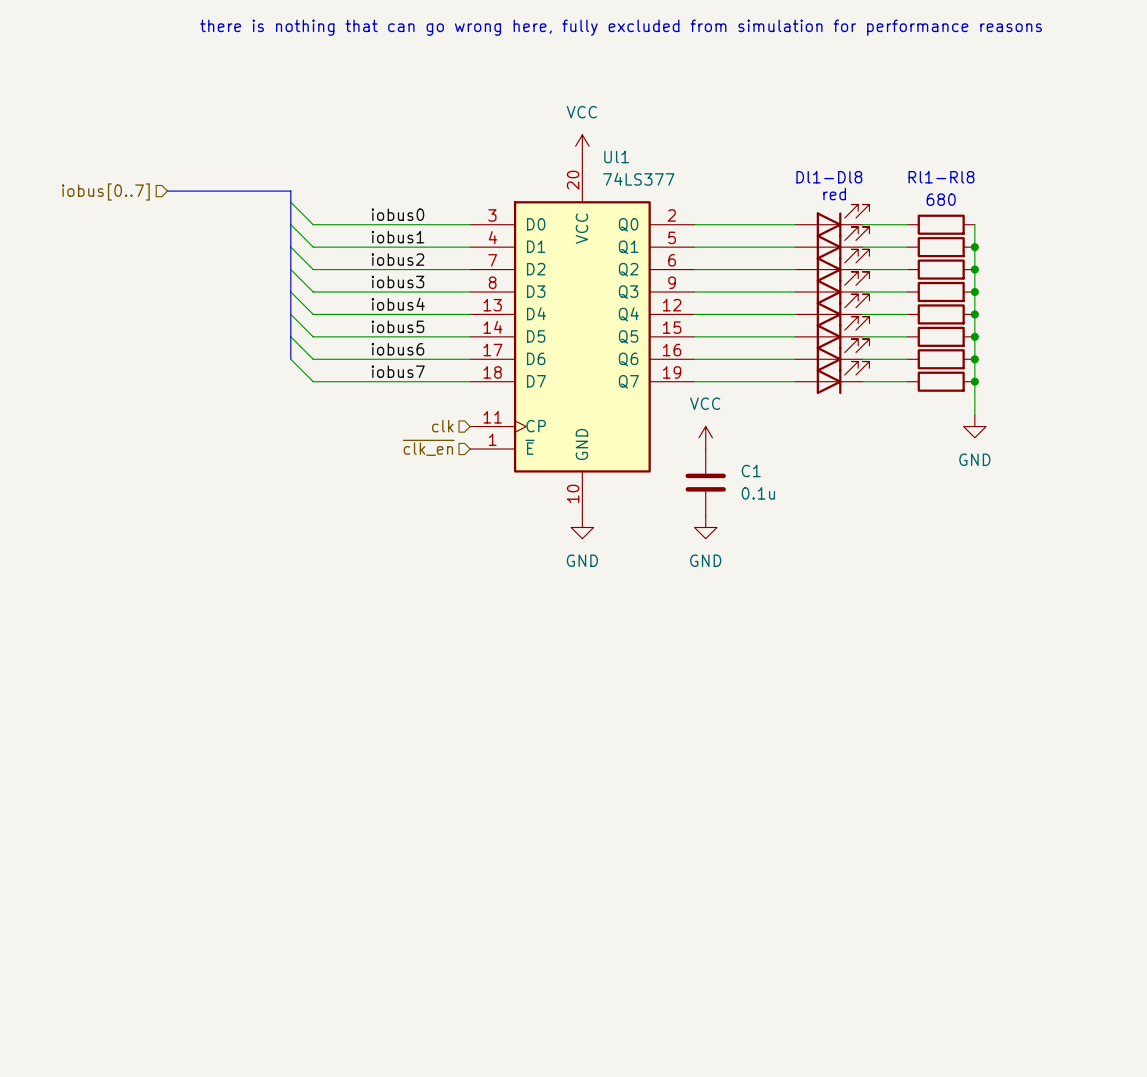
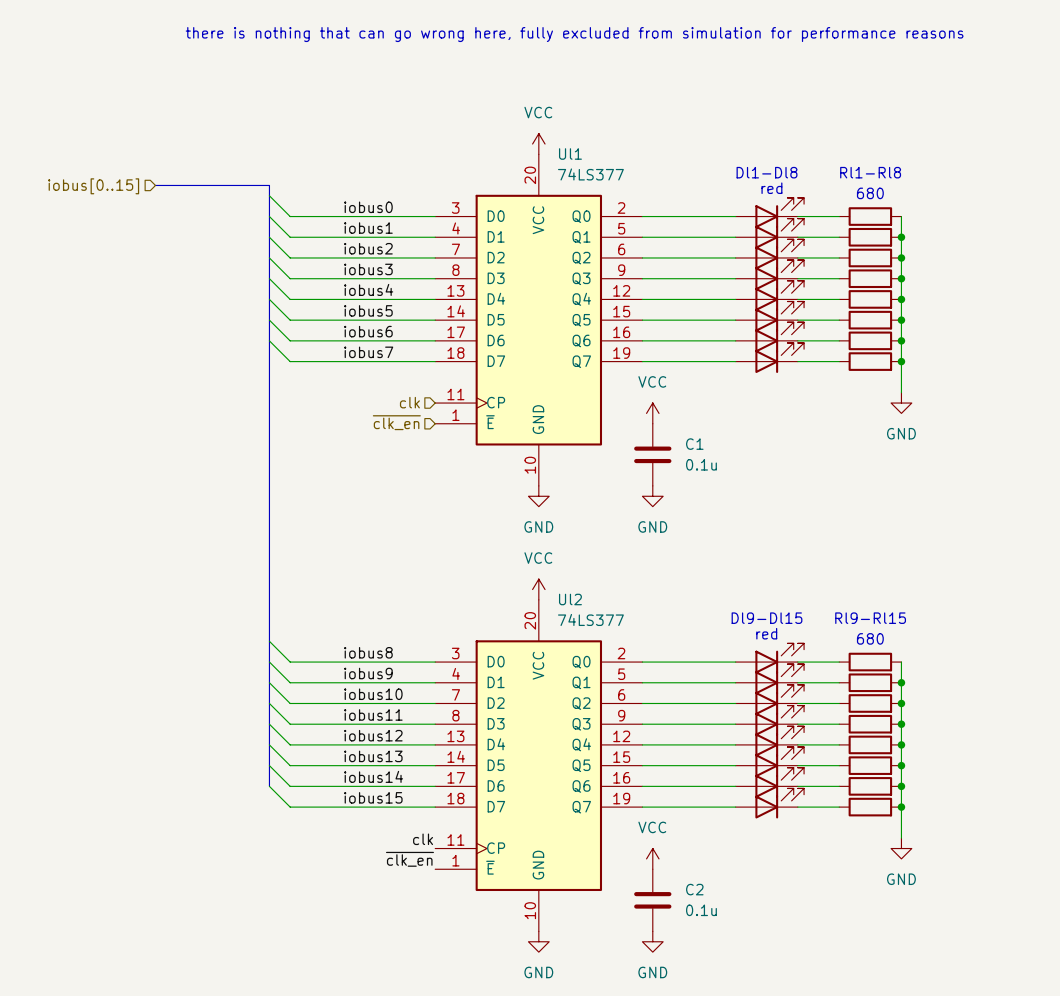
hierarchical label: iobus[0..7] (105, 191) -> iobus[0..15] (93, 186)
bus: none -> (269, 340) (269, 786)
power symbol: none -> VCC (538, 589)
text: none -> Dl9-Dl15 (767, 618)
text: none -> Rl9-Rl15 (870, 618)
text: none -> red (766, 633)
text: none -> 680 (870, 638)
wire: none -> (269, 641) (290, 662) (435, 662)
label: none -> iobus8 (368, 652)
part: none -> (769, 658)
wire: none -> (269, 662) (290, 682) (435, 682)
wire: none -> (642, 662) (735, 662)
wire: none -> (797, 662) (839, 662)
part: none -> (870, 662)
wire: none -> (901, 662) (901, 838)
label: none -> iobus9 (368, 673)
part: none -> (769, 679)
wire: none -> (269, 682) (290, 703) (435, 703)
wire: none -> (642, 682) (735, 682)
wire: none -> (797, 682) (839, 682)
part: none -> (870, 682)
junction: none -> (901, 682)
label: none -> iobus10 (373, 694)
part: none -> (769, 699)
wire: none -> (269, 703) (290, 724) (435, 724)
wire: none -> (642, 703) (735, 703)
wire: none -> (797, 703) (839, 703)
part: none -> (870, 703)
junction: none -> (901, 703)
label: none -> iobus11 (373, 714)
part: none -> (769, 720)
wire: none -> (269, 724) (290, 744) (435, 744)
wire: none -> (642, 724) (735, 724)
wire: none -> (797, 724) (839, 724)
part: none -> (870, 724)
junction: none -> (901, 724)
label: none -> iobus12 (373, 735)
part: none -> (769, 741)
wire: none -> (269, 744) (290, 765) (435, 765)
wire: none -> (642, 744) (735, 744)
wire: none -> (797, 744) (839, 744)
part: none -> (870, 744)
junction: none -> (901, 744)
label: none -> iobus13 (373, 756)
part: none -> (769, 762)
wire: none -> (269, 765) (290, 786) (435, 786)
Ul2: none -> 74LS377 (538, 765)
wire: none -> (642, 765) (735, 765)
wire: none -> (797, 765) (839, 765)
part: none -> (870, 765)
junction: none -> (901, 765)
label: none -> iobus14 (373, 776)
part: none -> (769, 782)
wire: none -> (269, 786) (290, 807) (435, 807)
wire: none -> (642, 786) (735, 786)
wire: none -> (797, 786) (839, 786)
part: none -> (870, 786)
junction: none -> (901, 786)
label: none -> iobus15 (373, 797)
part: none -> (769, 803)
wire: none -> (642, 807) (735, 807)
wire: none -> (797, 807) (839, 807)
part: none -> (870, 807)
junction: none -> (901, 807)
label: none -> clk (423, 839)
power symbol: none -> GND (901, 848)
power symbol: none -> VCC (652, 858)
label: none -> ~{clk_en} (409, 859)
C2: none -> 0.1u (652, 900)
power symbol: none -> GND (538, 941)
power symbol: none -> GND (652, 941)

